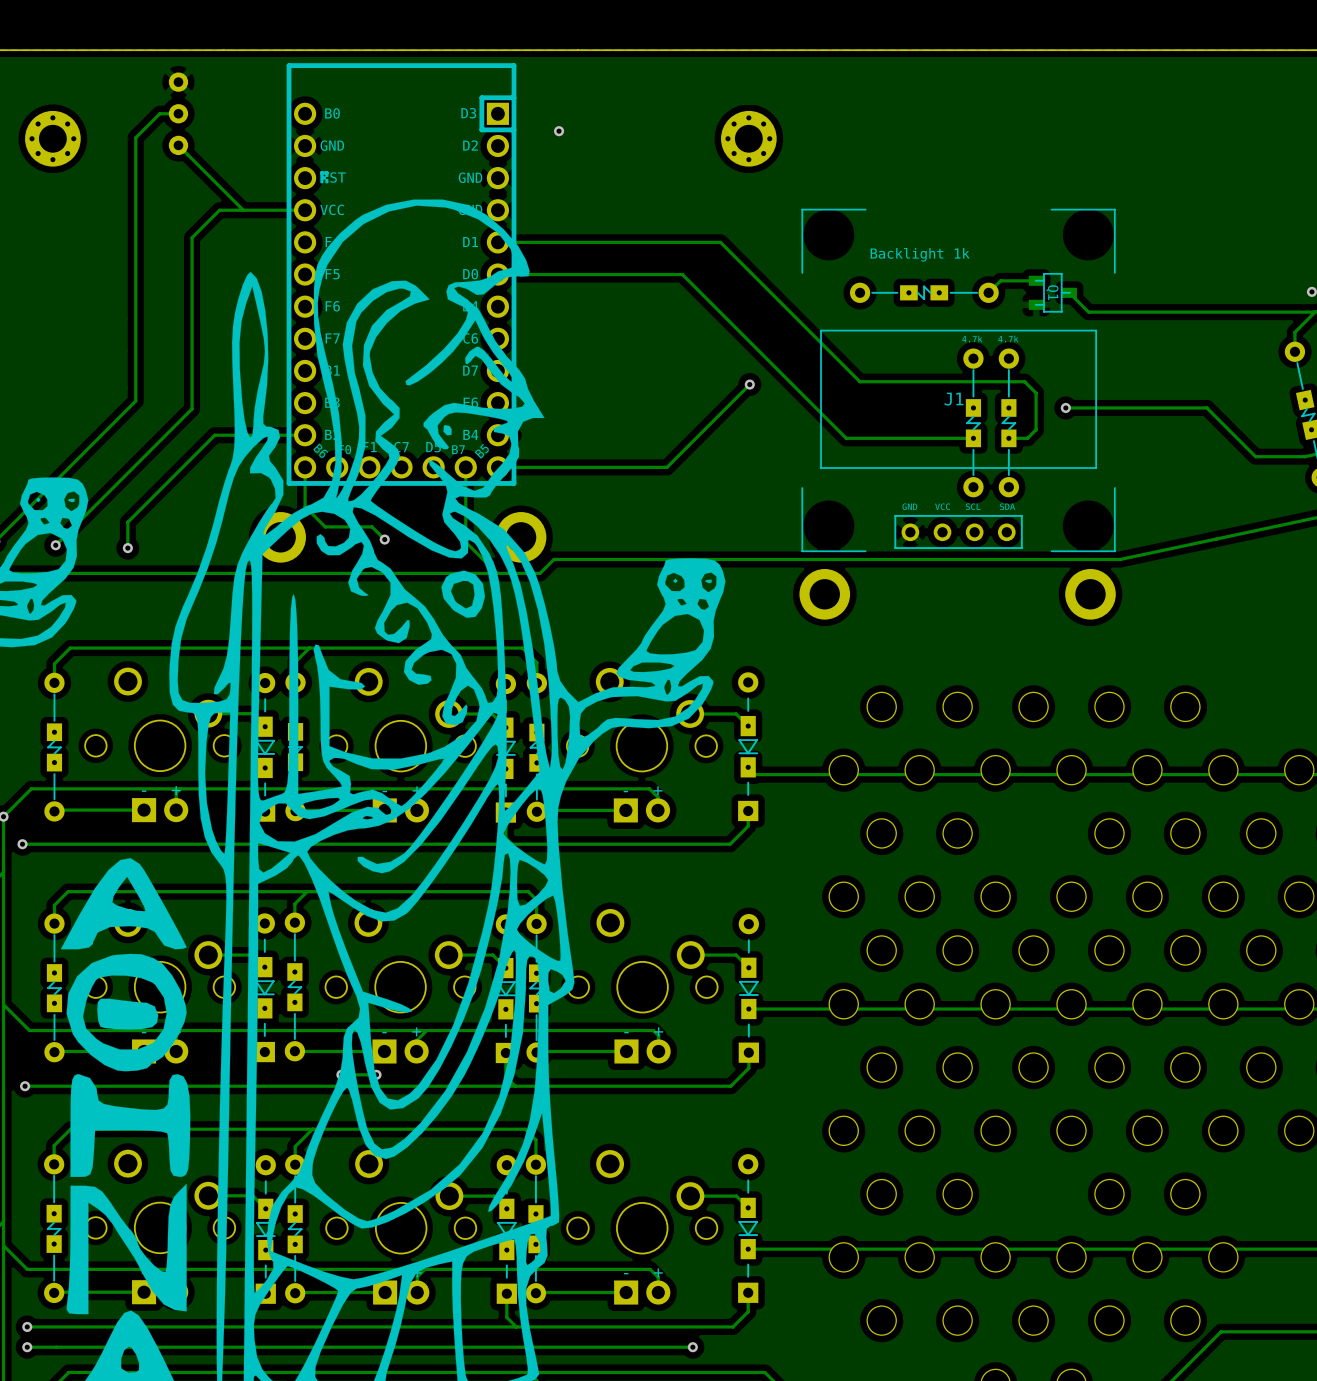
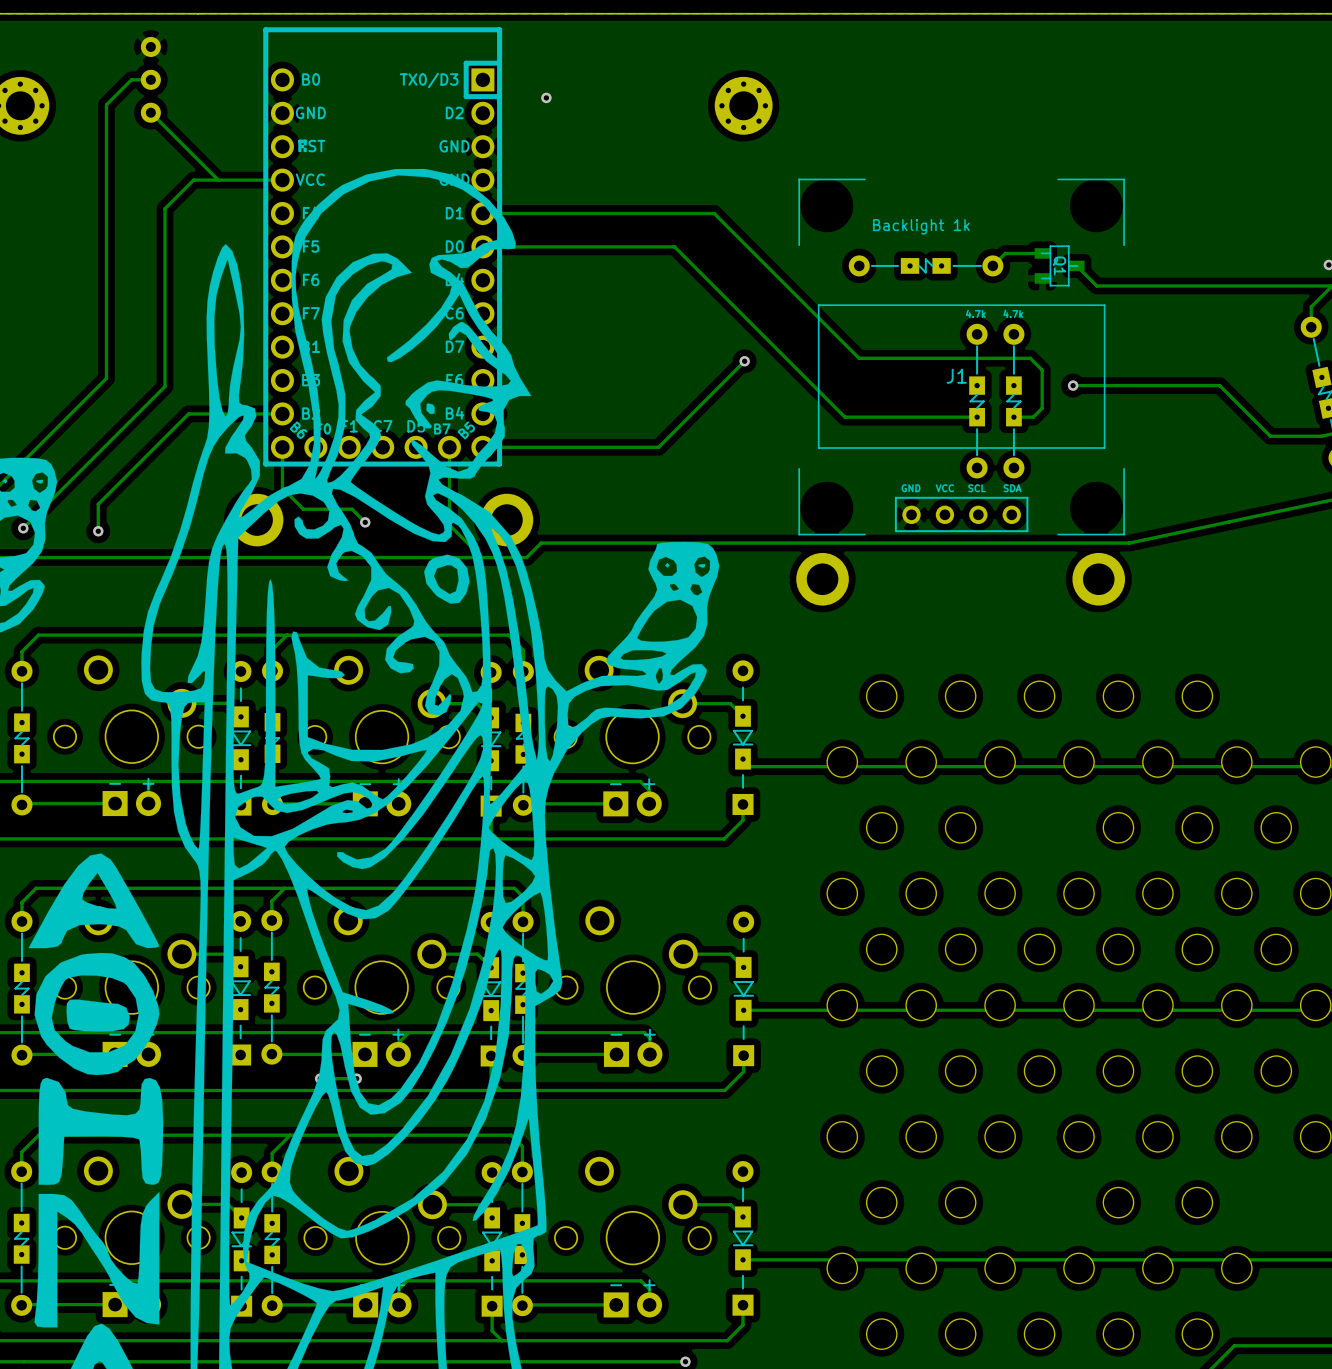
part text: D3 (468, 113) -> none
part text: none -> TX0/D3 (429, 80)

